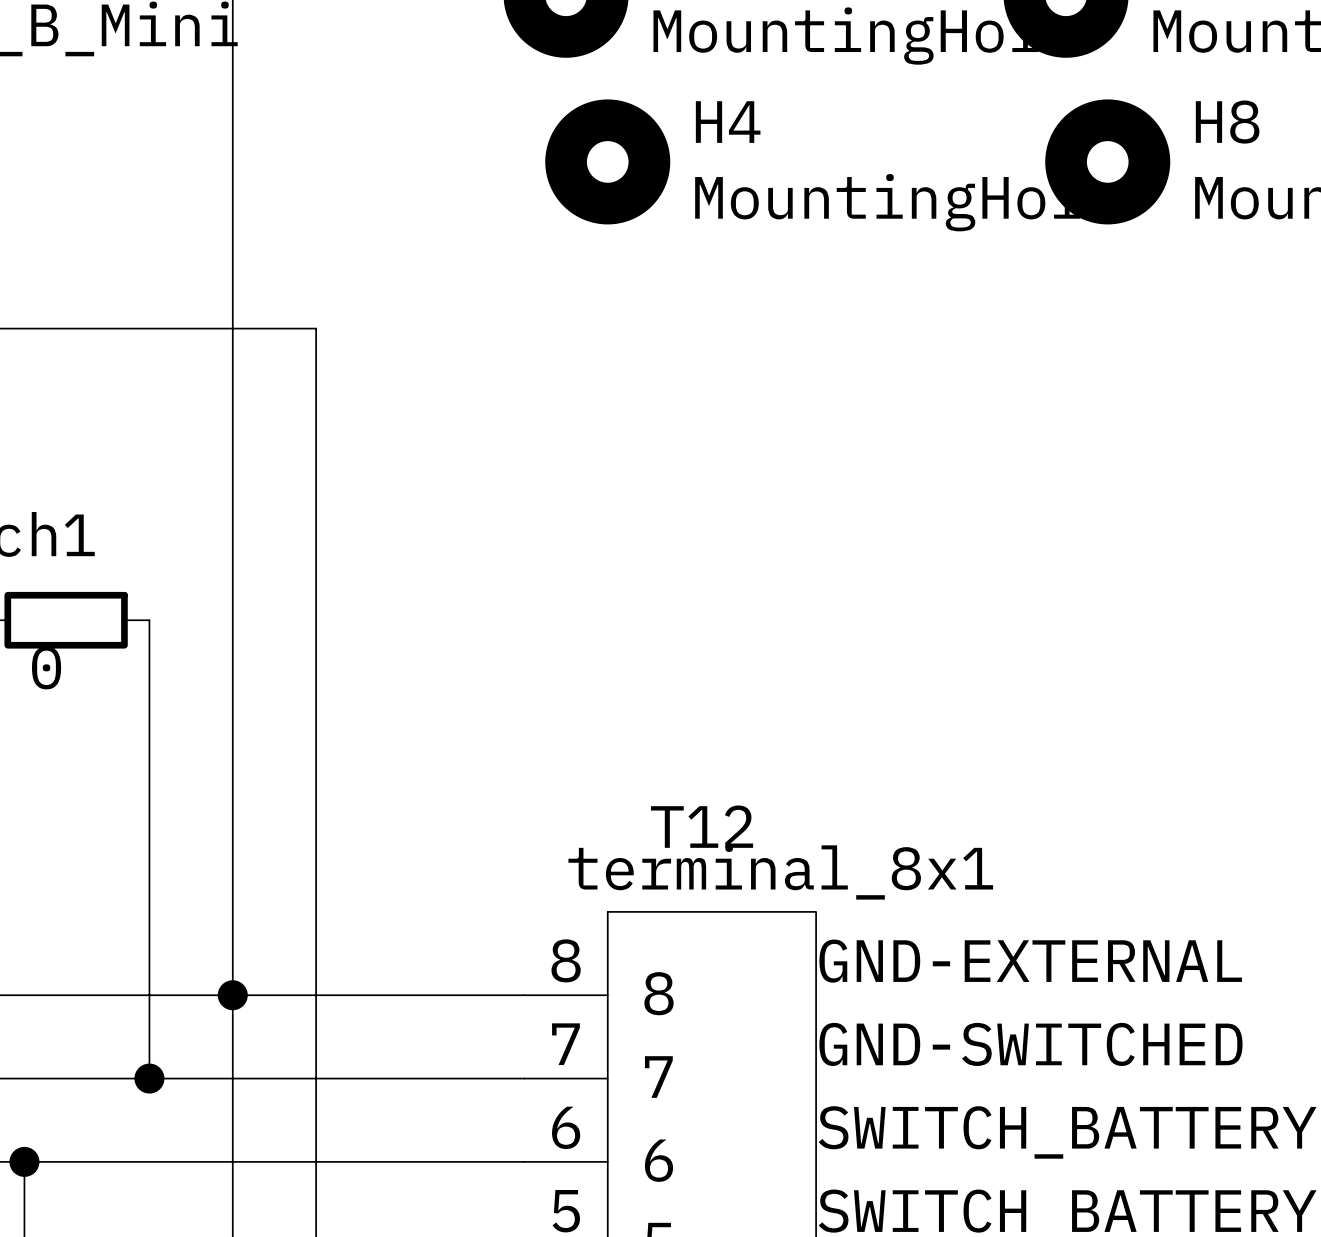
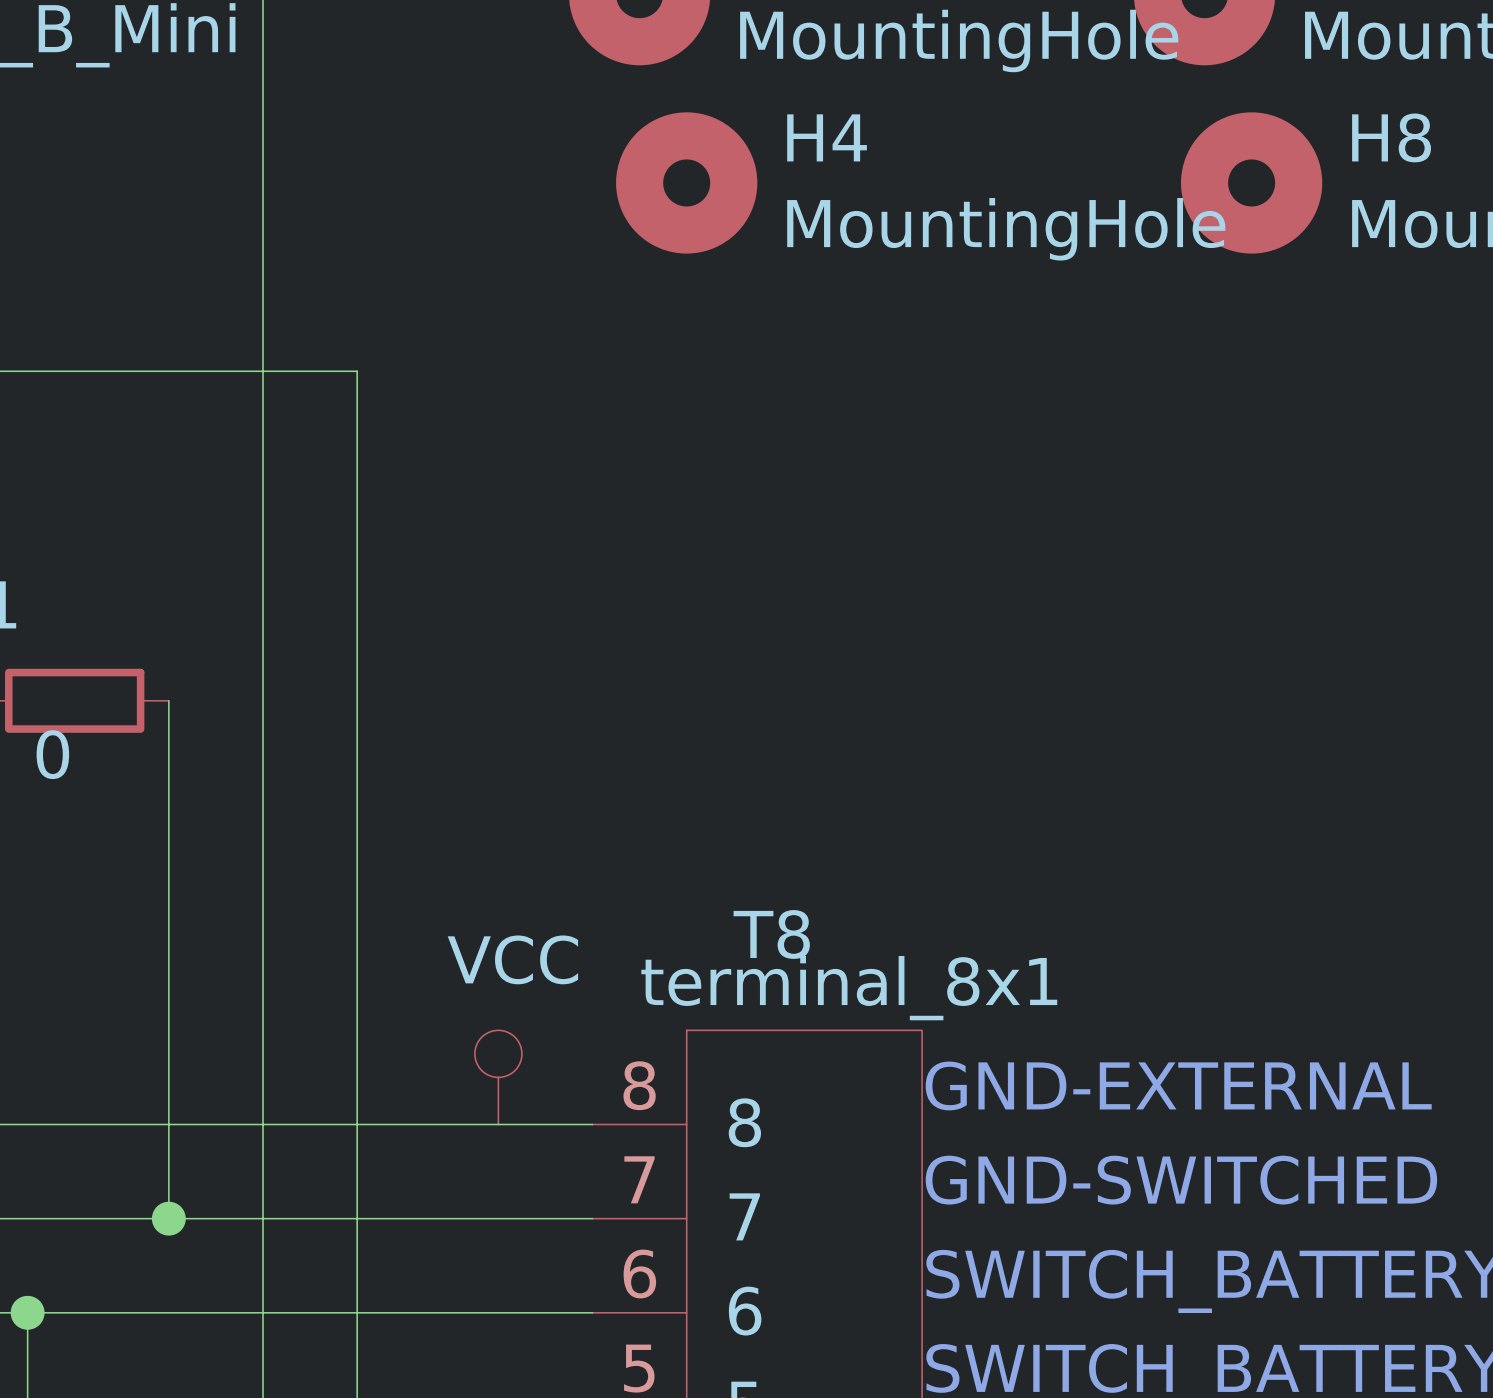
T12 name: T12 (702, 826) -> T8 (771, 934)
power symbol: none -> VCC (498, 1077)
junction: (232, 995) -> none

